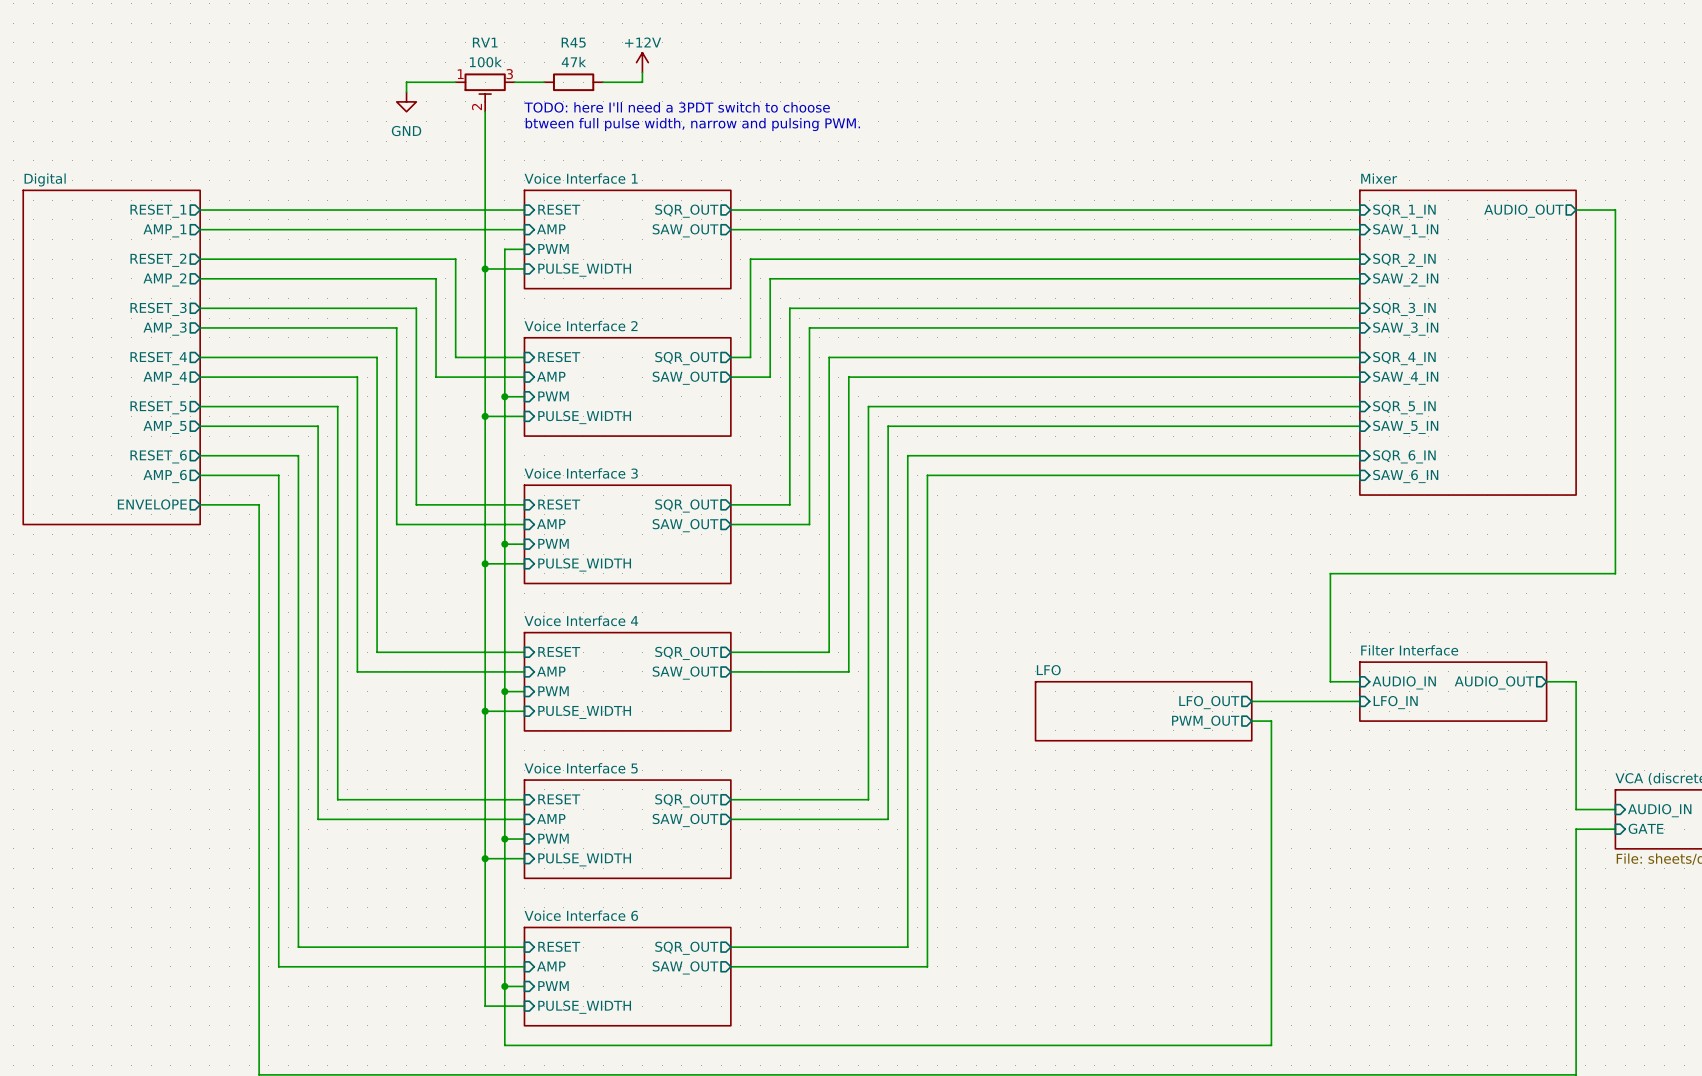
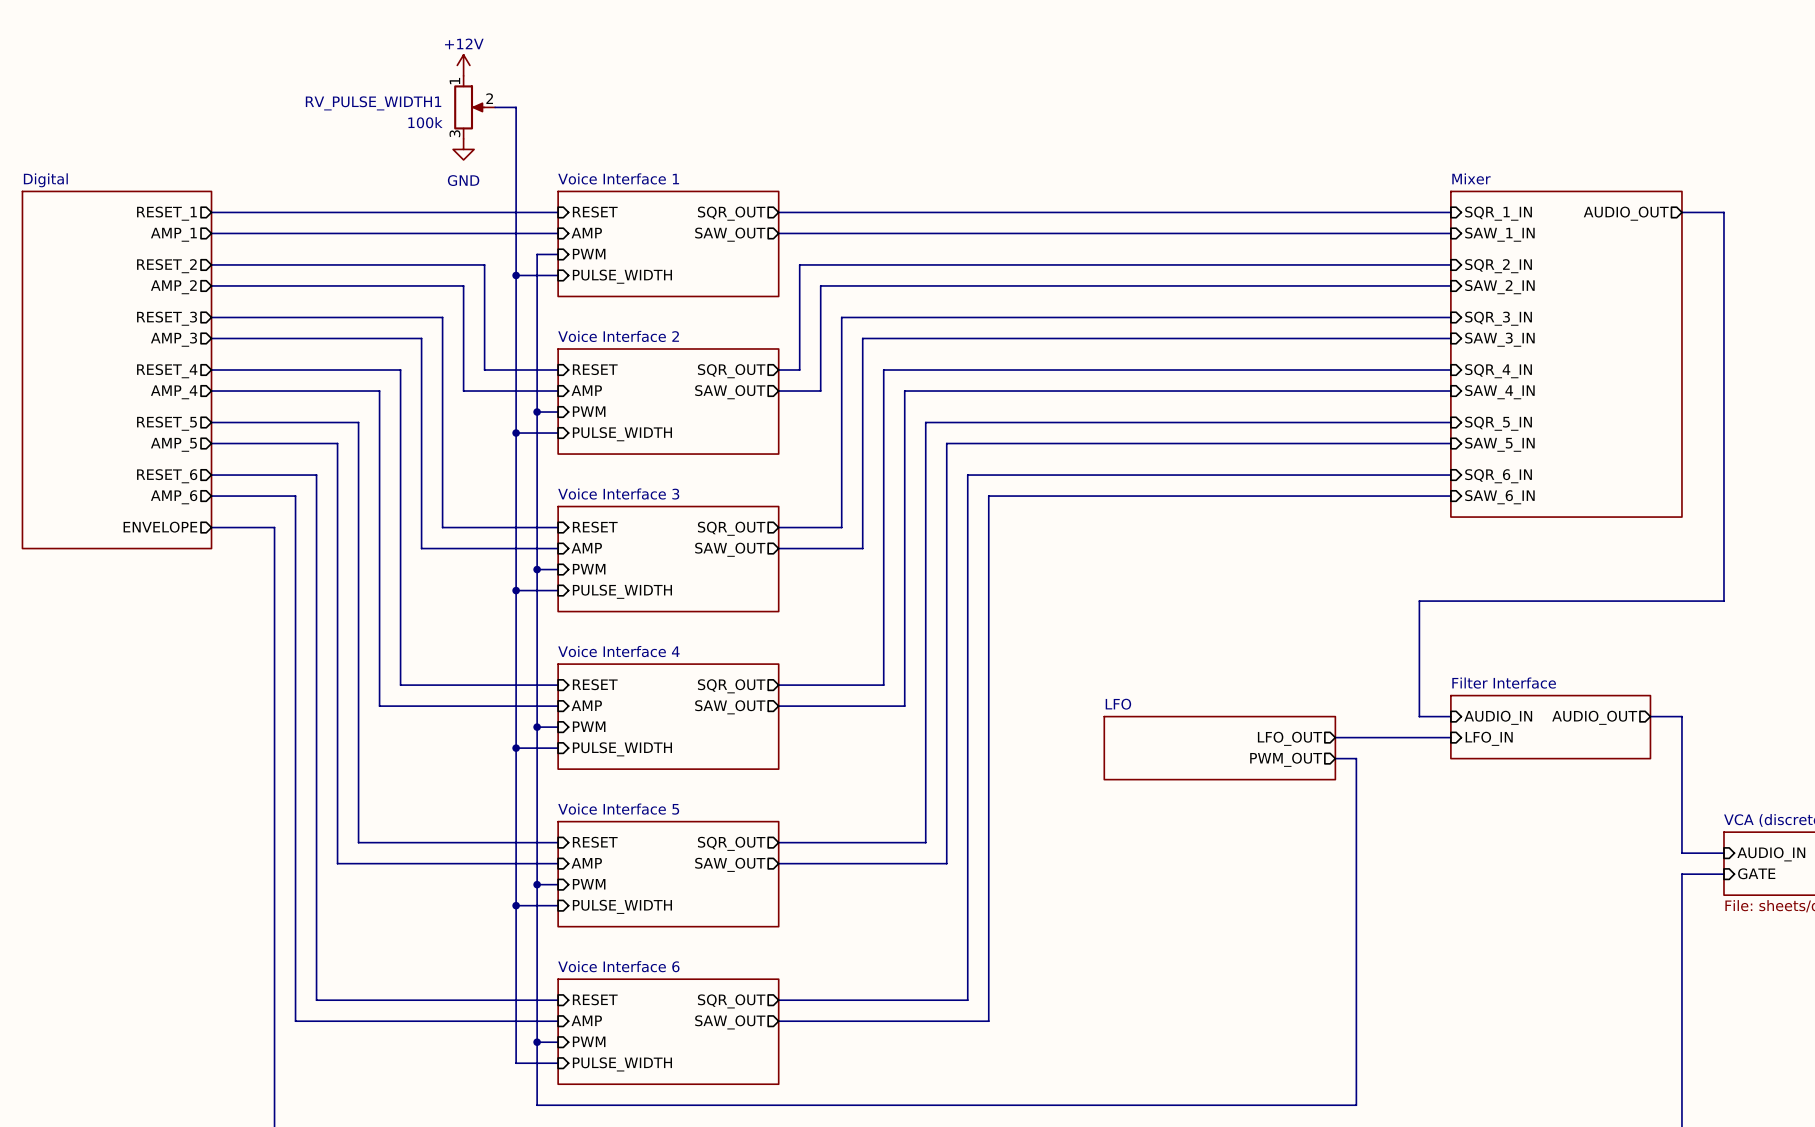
power symbol: +12V (642, 62) -> none
power symbol: none -> +12V (463, 65)
wire: (642, 72) (642, 82) (603, 82) -> none
wire: (455, 82) (406, 82) (406, 92) -> none
wire: (514, 82) (544, 82) -> none
R45: 47k (573, 82) -> none
RV1: 100k (485, 92) -> none
power symbol position: GND (406, 101) -> GND (463, 149)
text: TODO: here I'll need a 3PDT switch to choose (677, 107) -> none
RV_PULSE_WIDTH1: none -> 100k (474, 107)
wire: none -> (495, 107) (516, 107)
text: btween full pulse width, narrow and pulsing PWM. (692, 124) -> none

